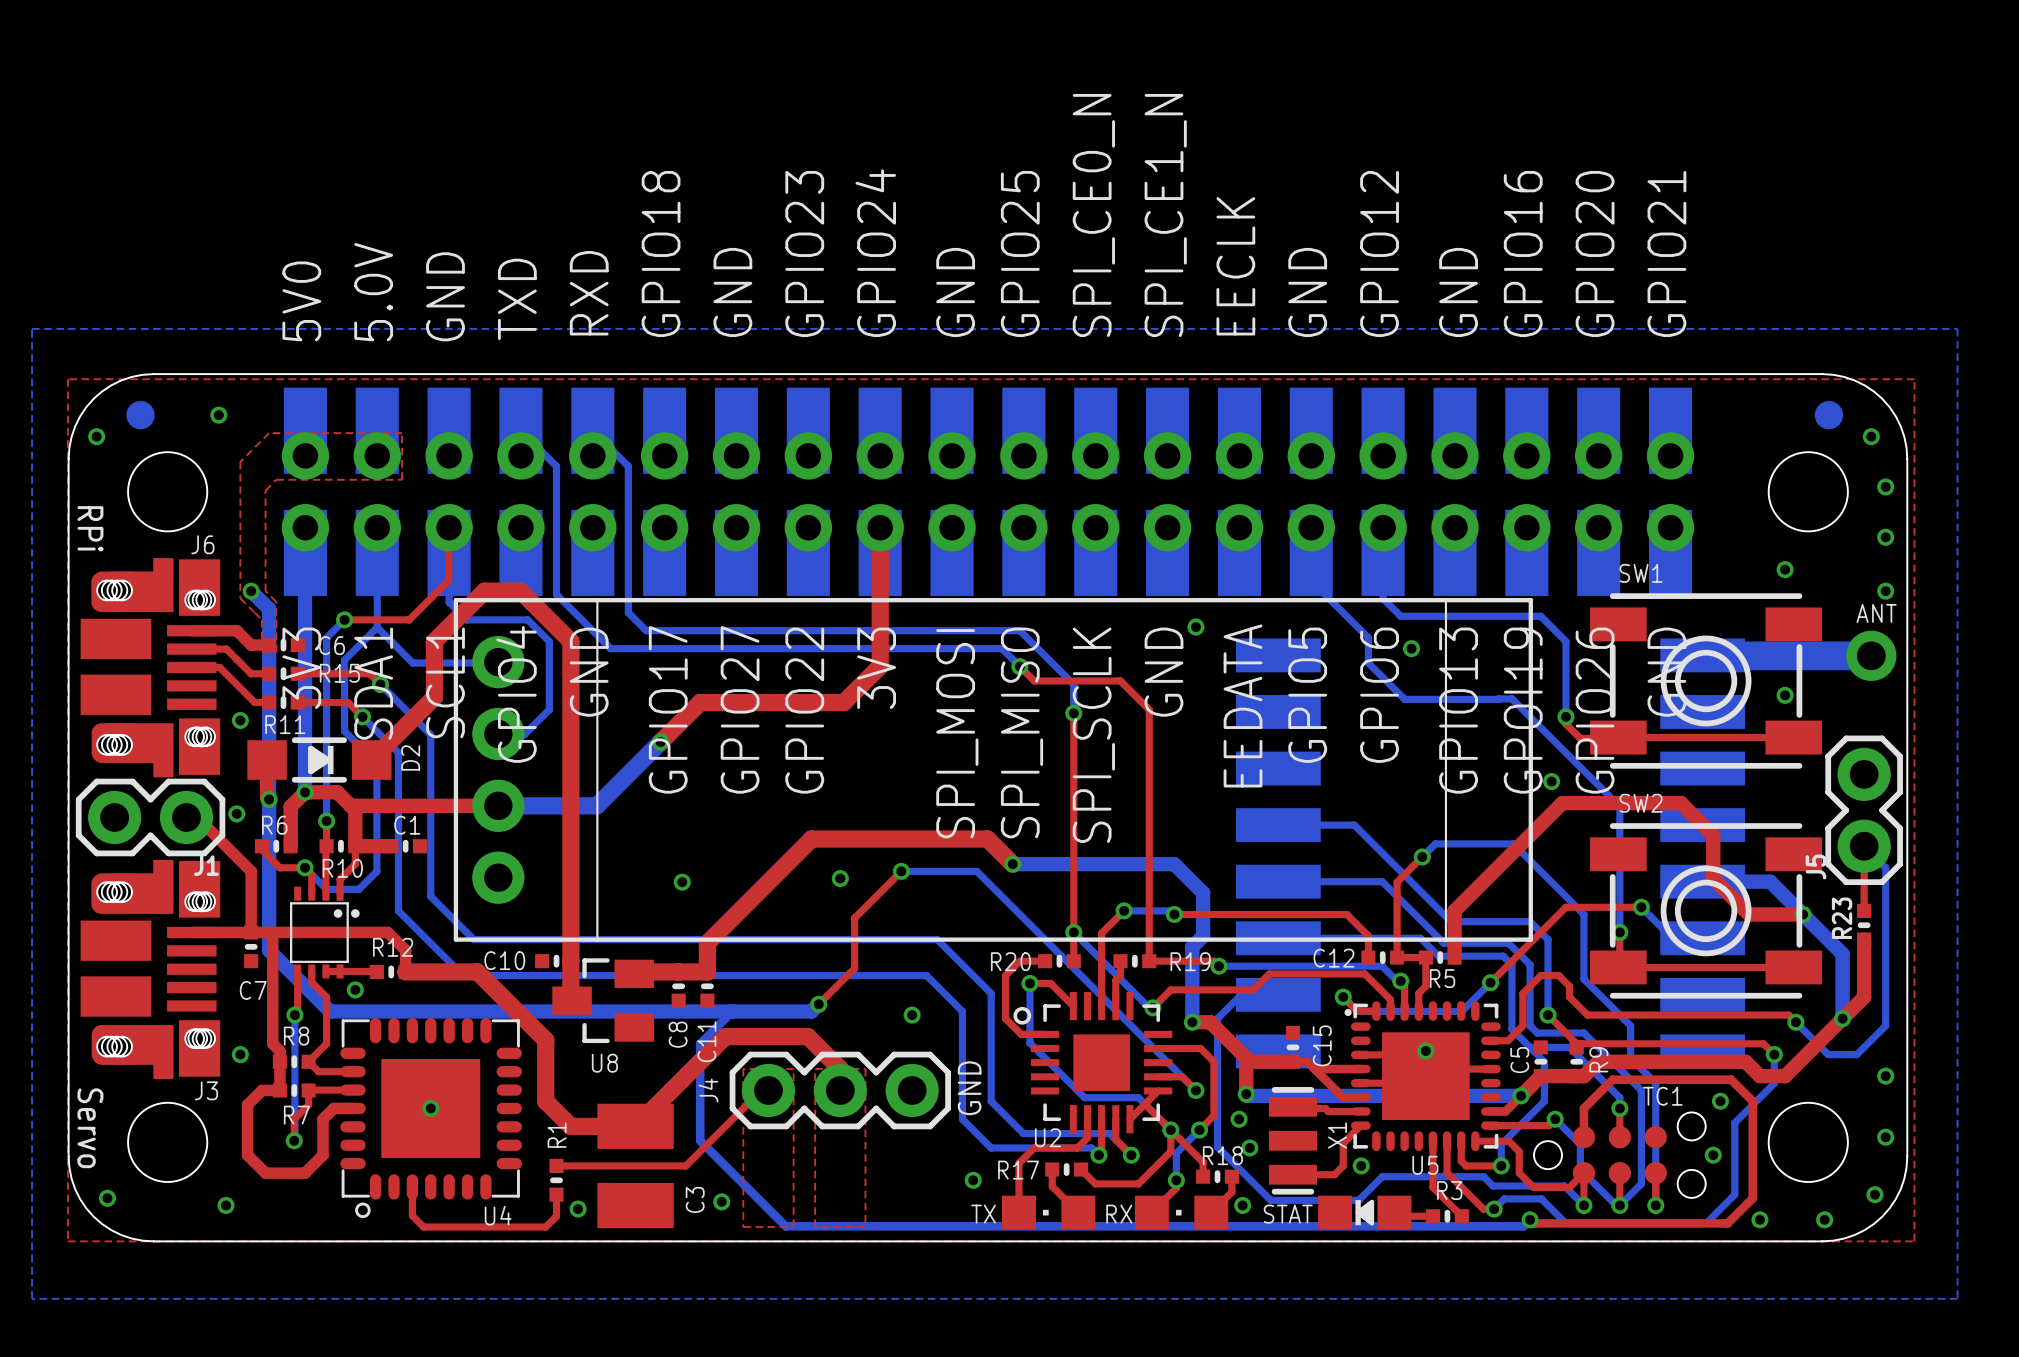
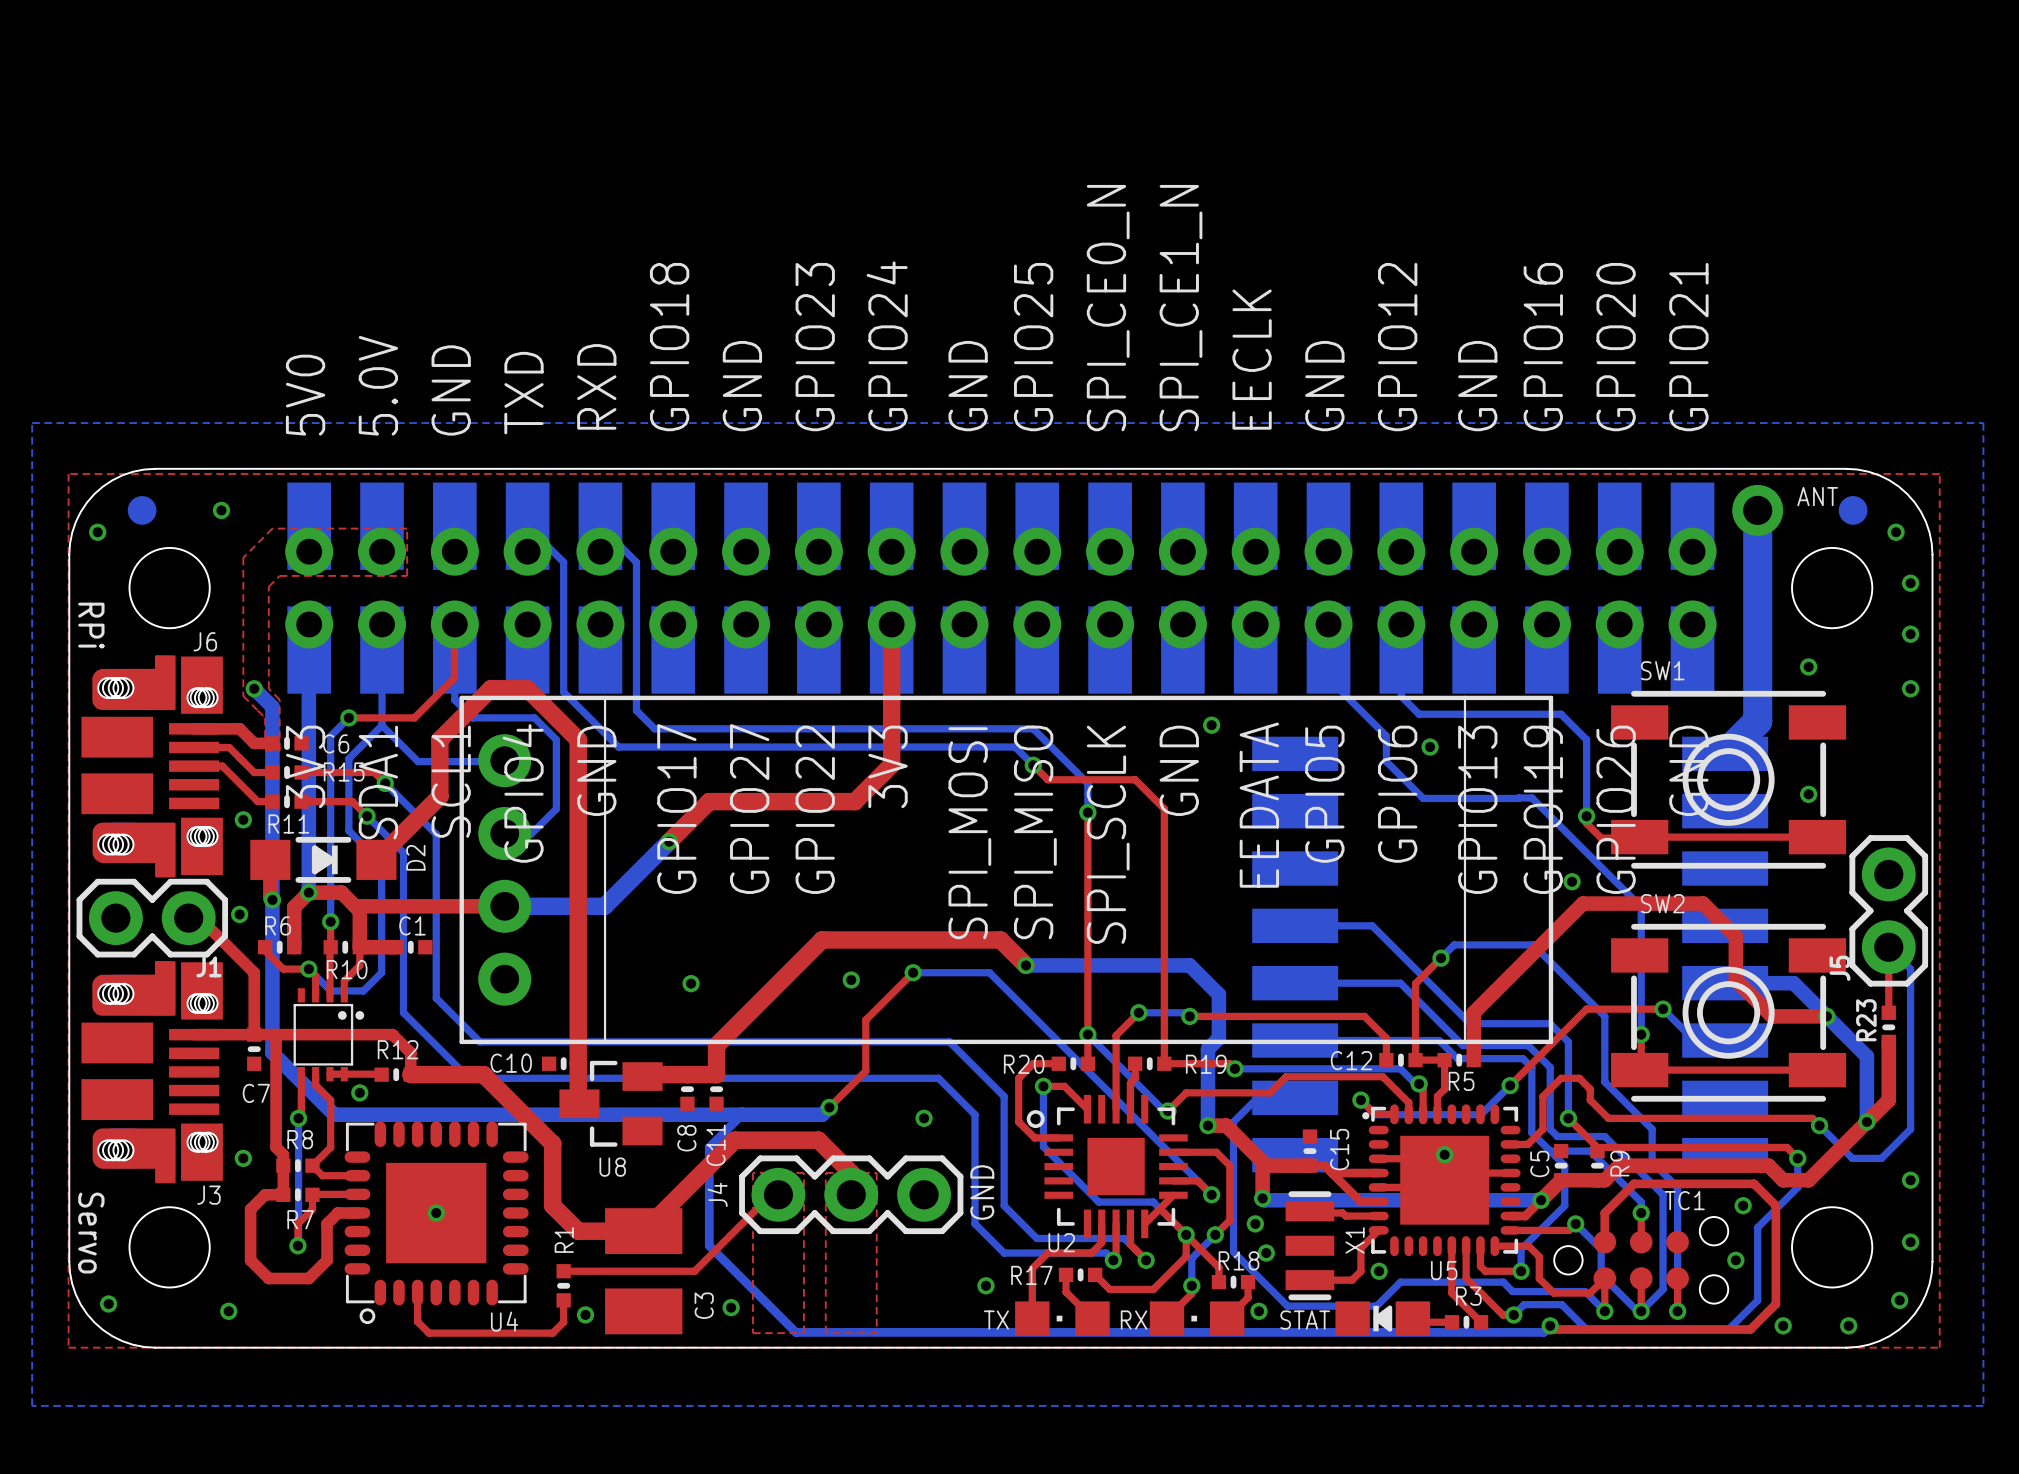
ANT name position: ANT (1876, 613) -> ANT (1817, 496)
bottom track: (1702, 655) (1871, 655) -> (1725, 753) (1757, 721) (1757, 510)
ANT position: (1871, 655) -> (1757, 510)

